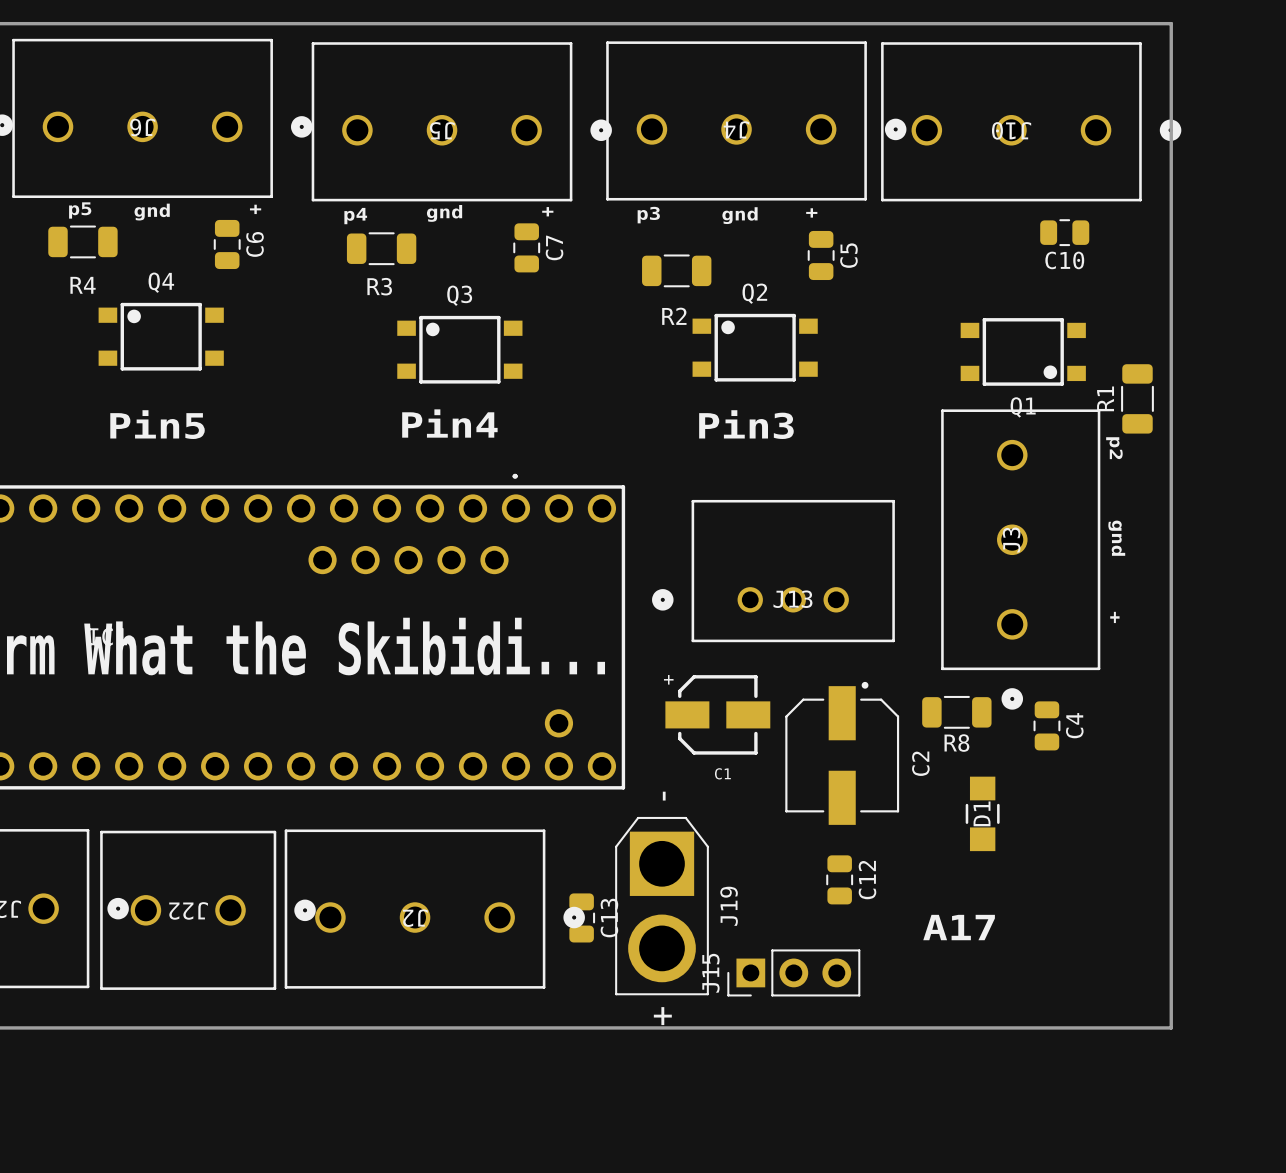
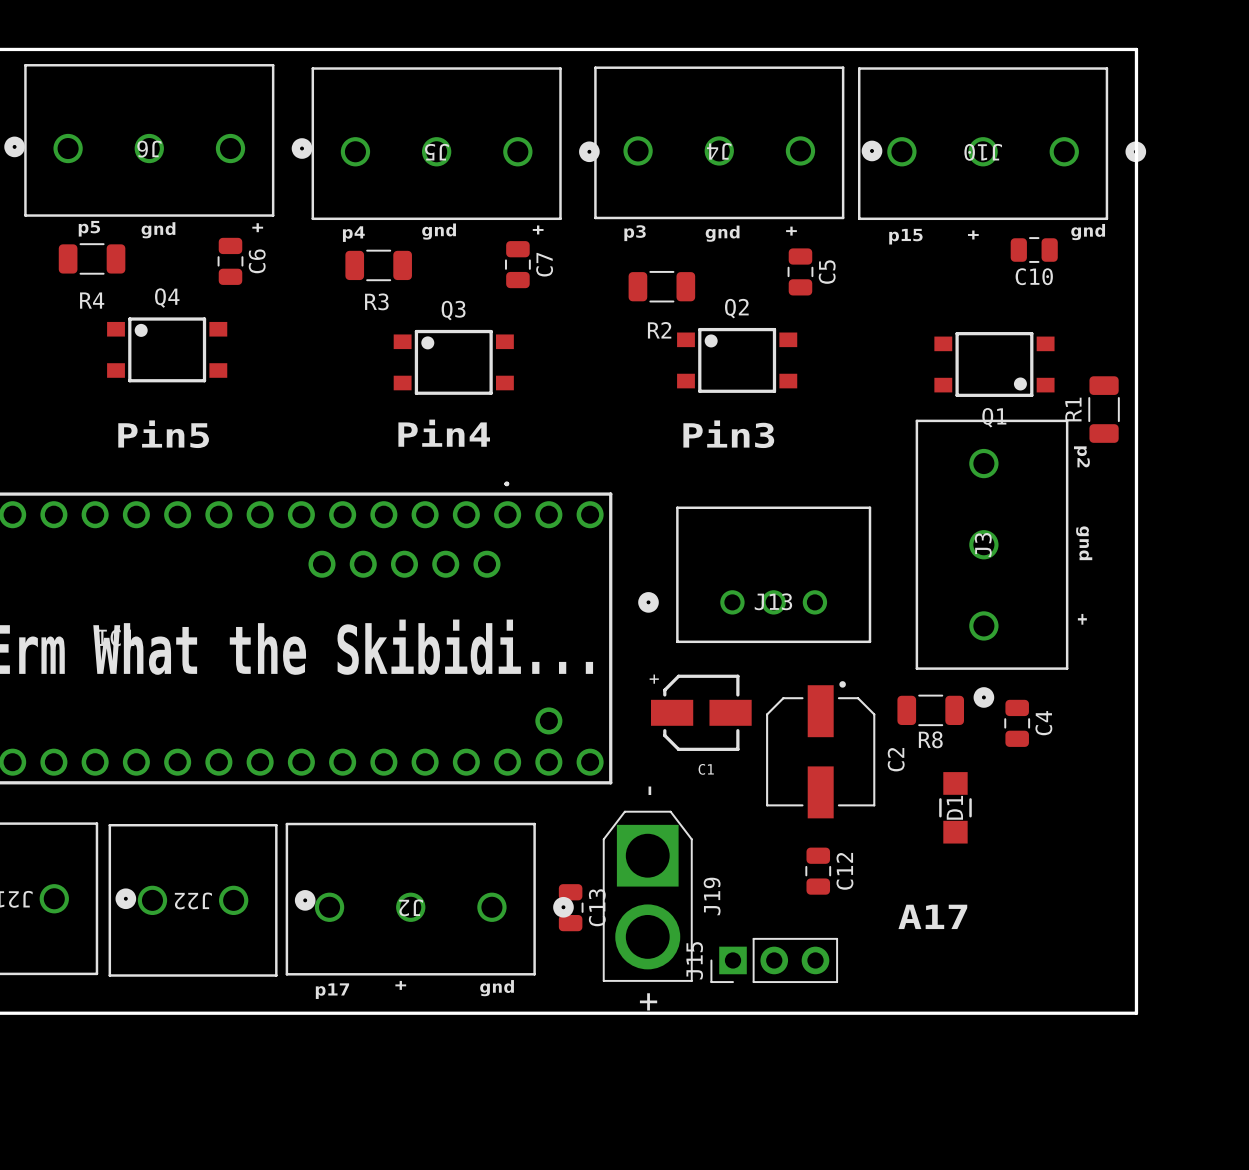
text: none -> gnd (1088, 232)
text: none -> + (973, 235)
text: none -> p15 (905, 236)
text: none -> + (400, 985)
text: none -> gnd (497, 988)
text: none -> p17 (332, 991)

